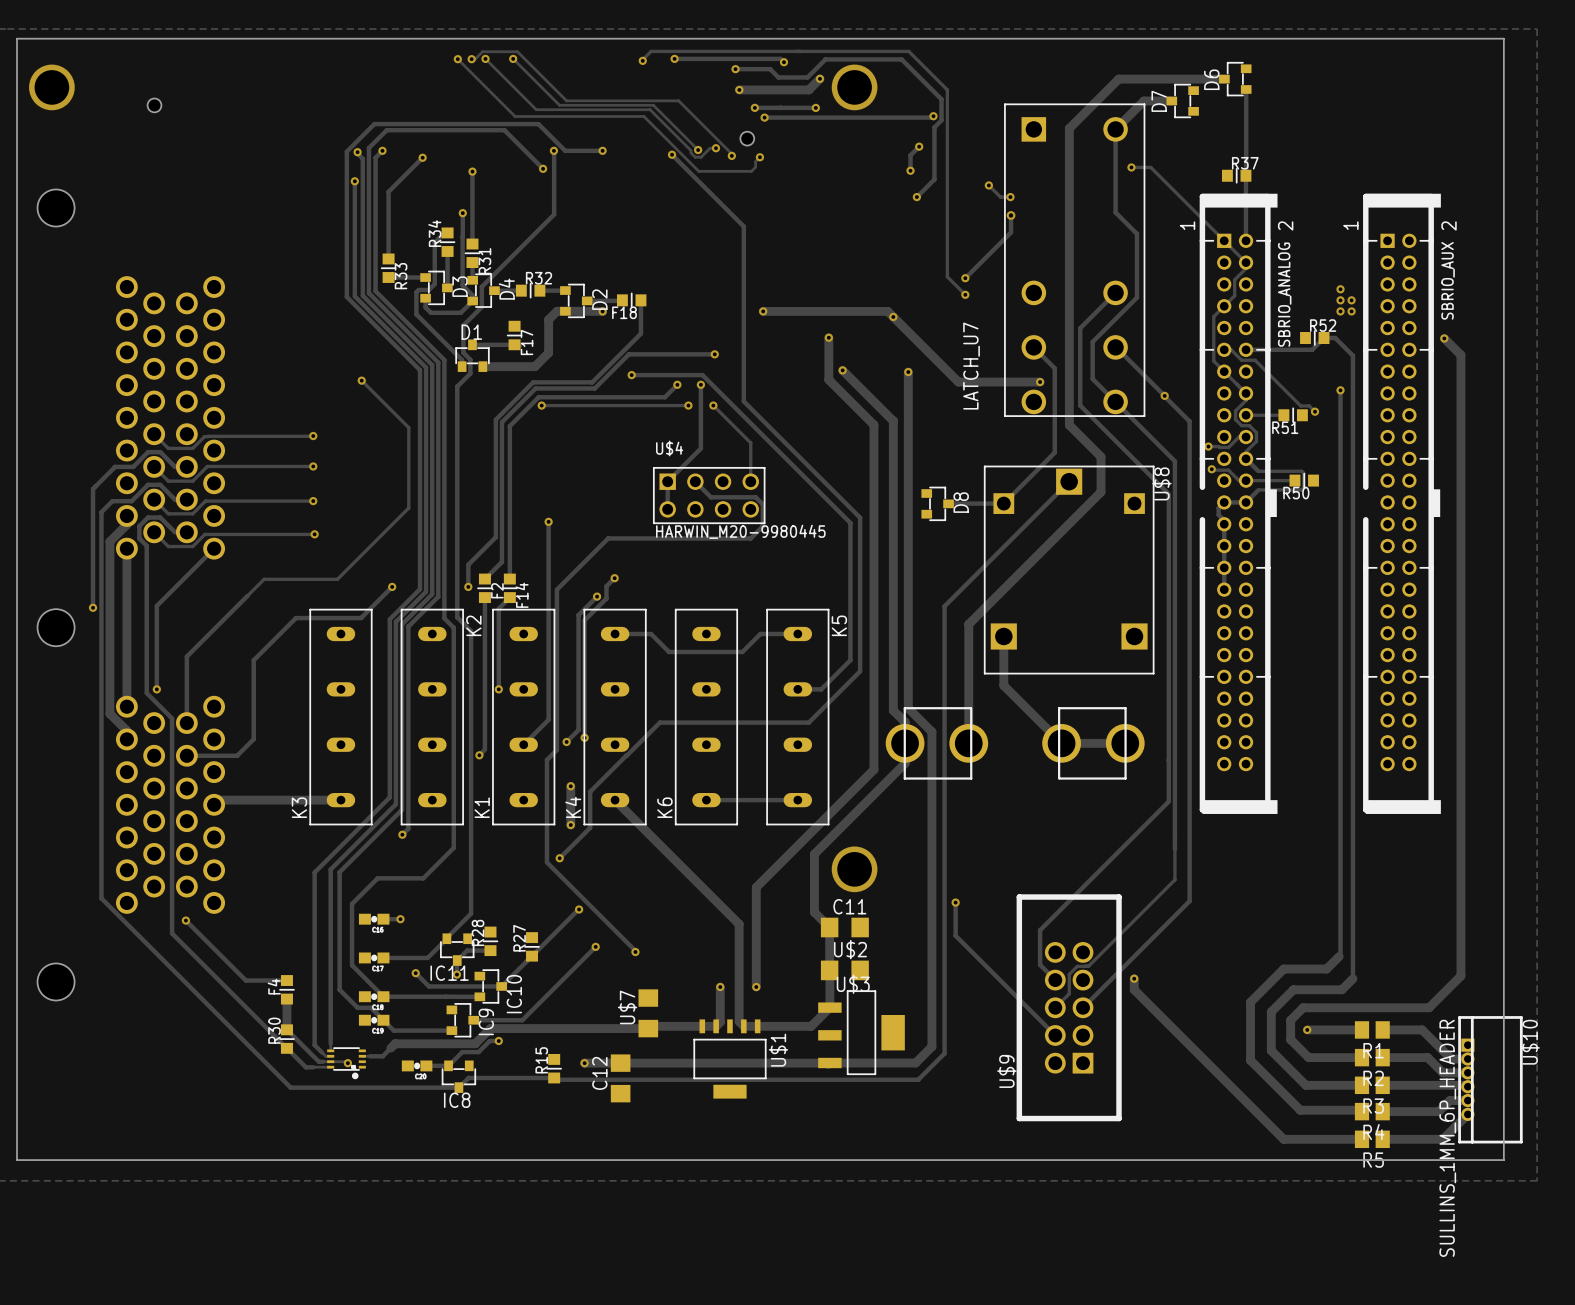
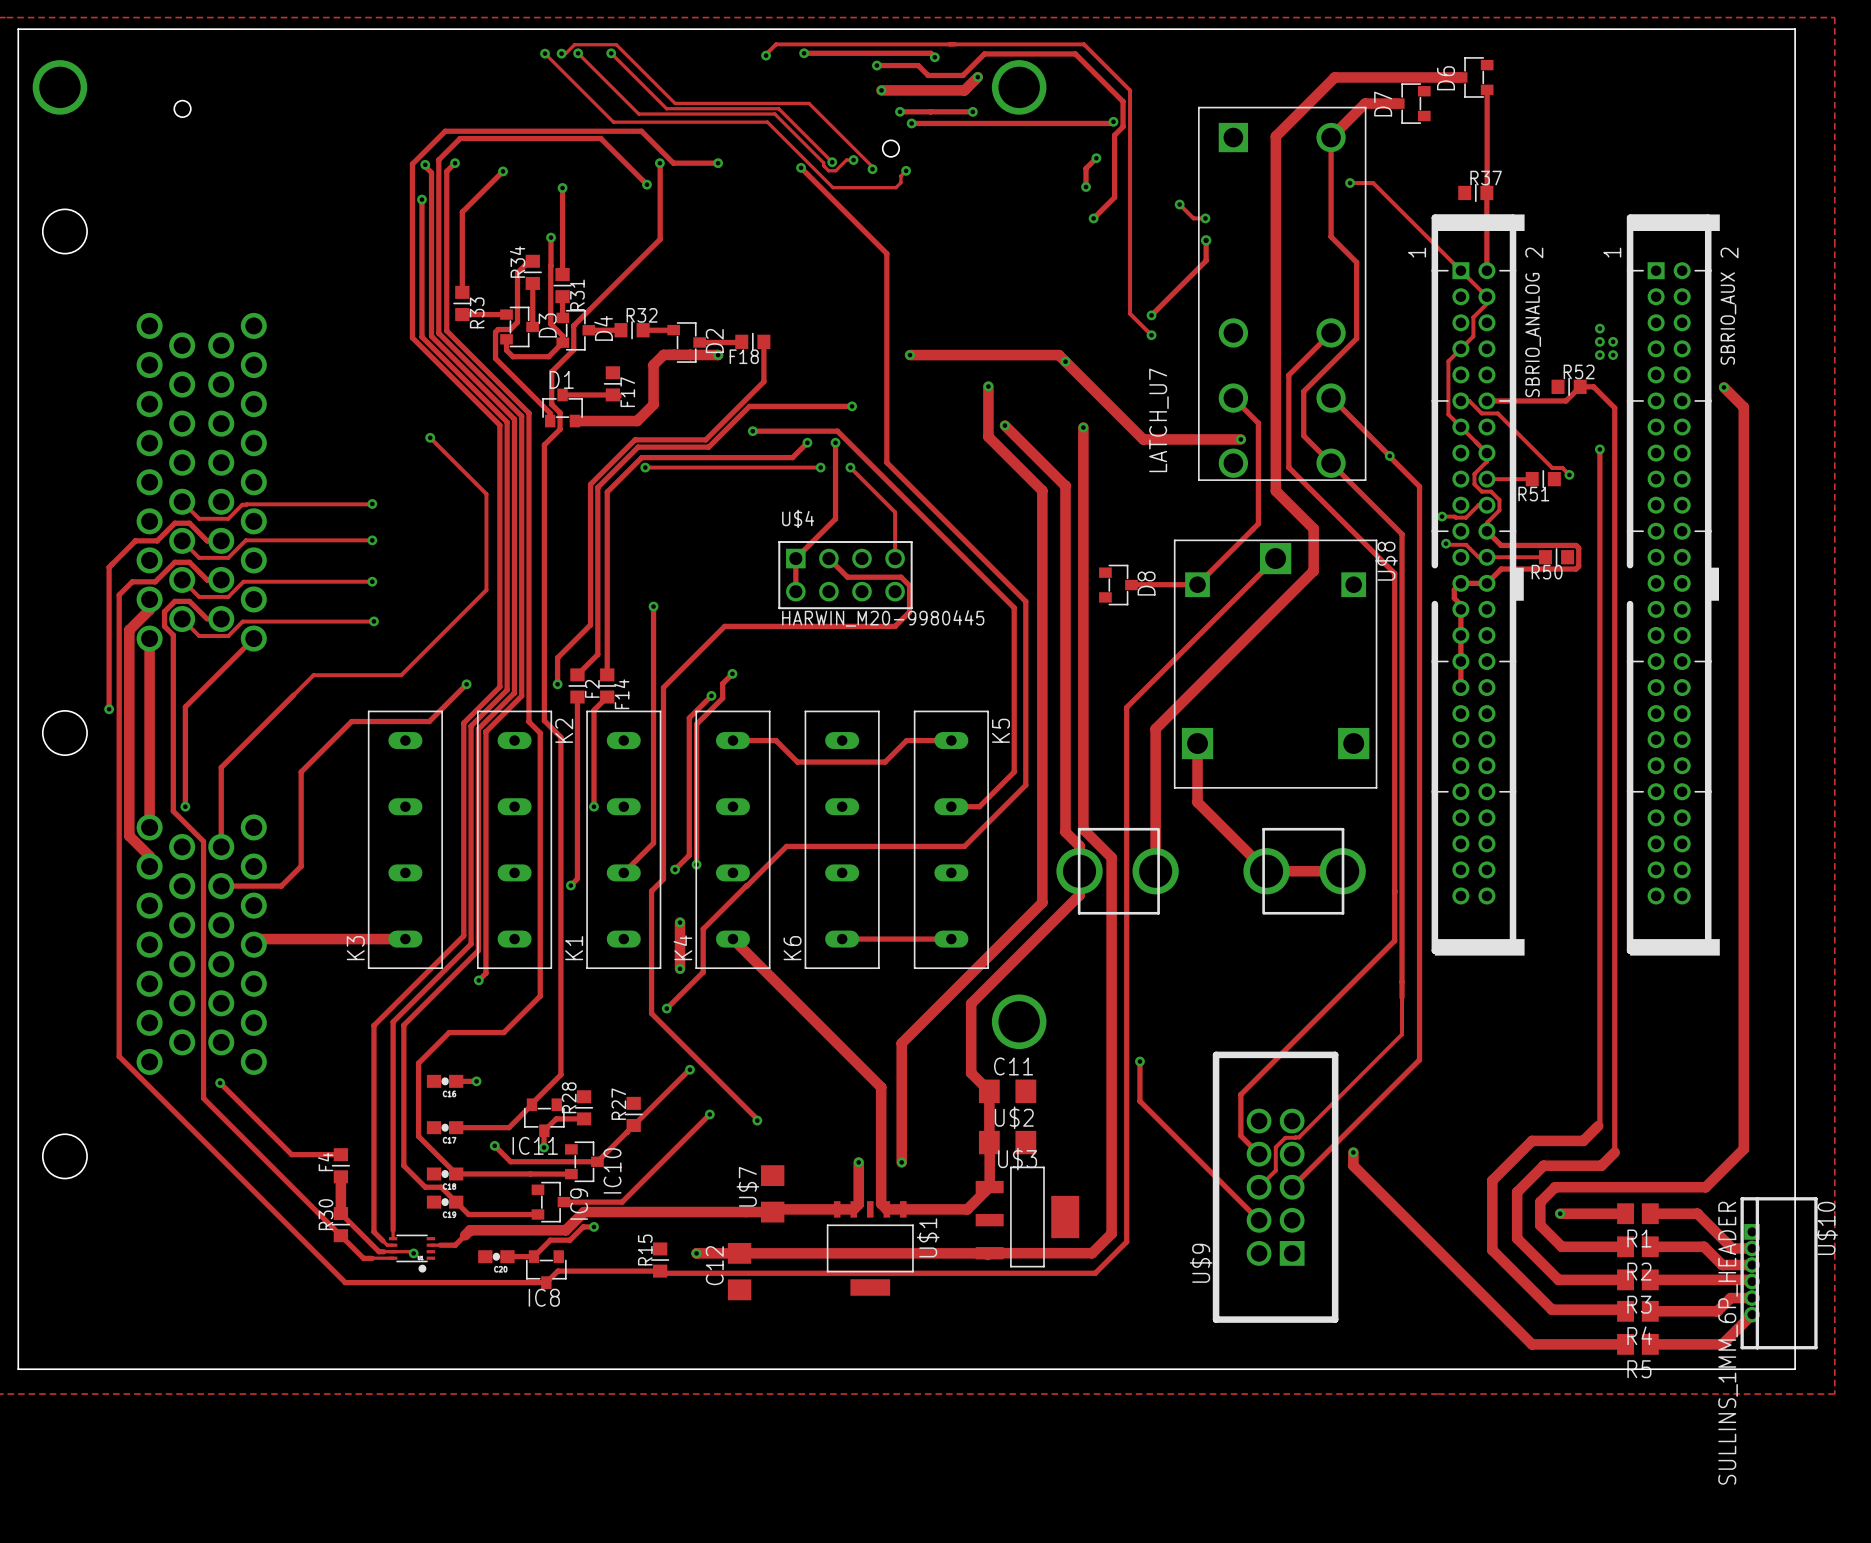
track: (1257, 470) (1301, 471) (1303, 473) (1303, 487) (1301, 489) (1257, 490) -> (1501, 545) (1576, 545) (1578, 548) (1578, 566) (1576, 569) (1501, 569)

